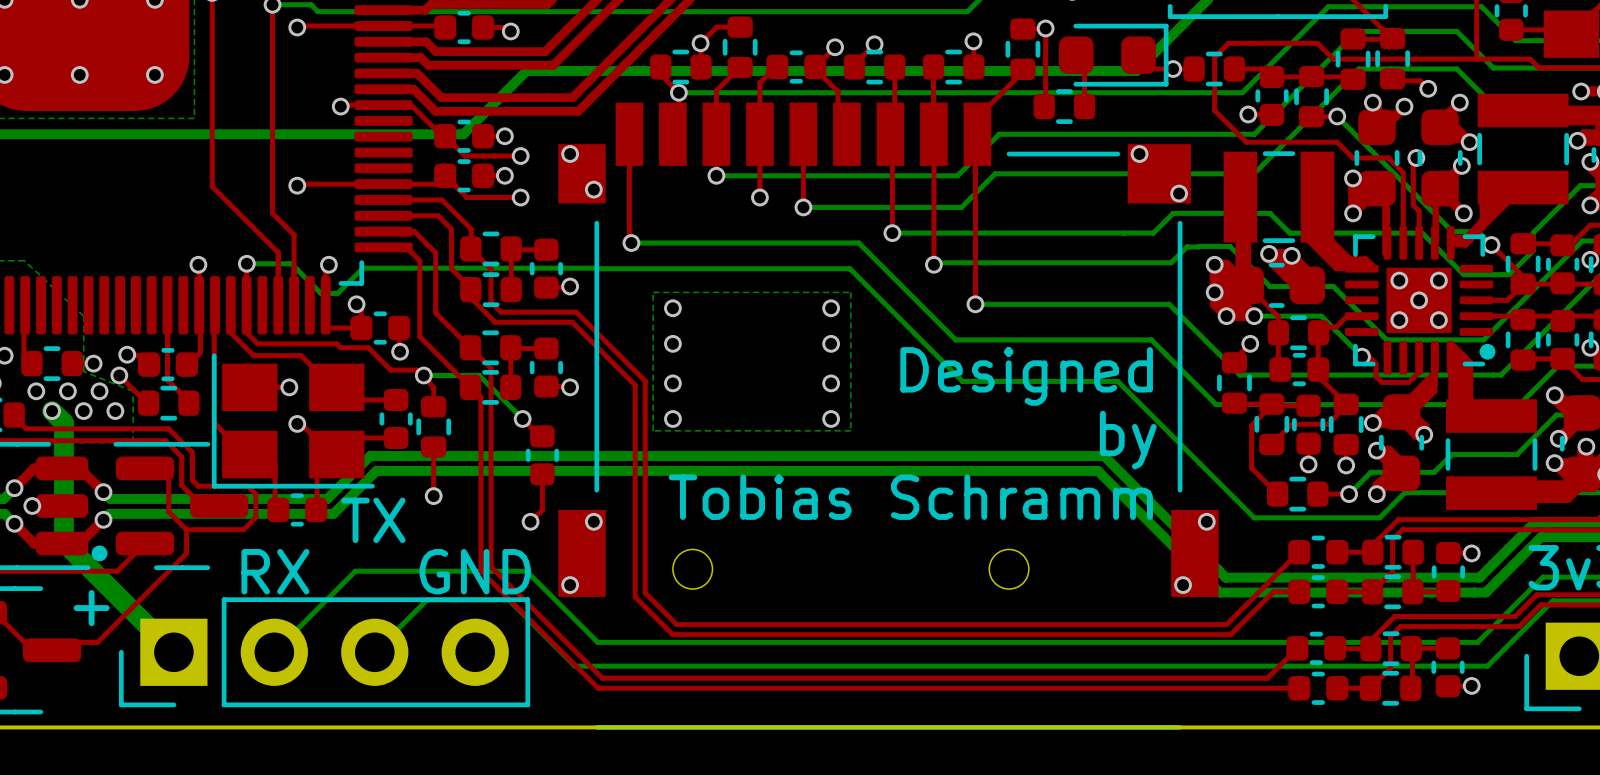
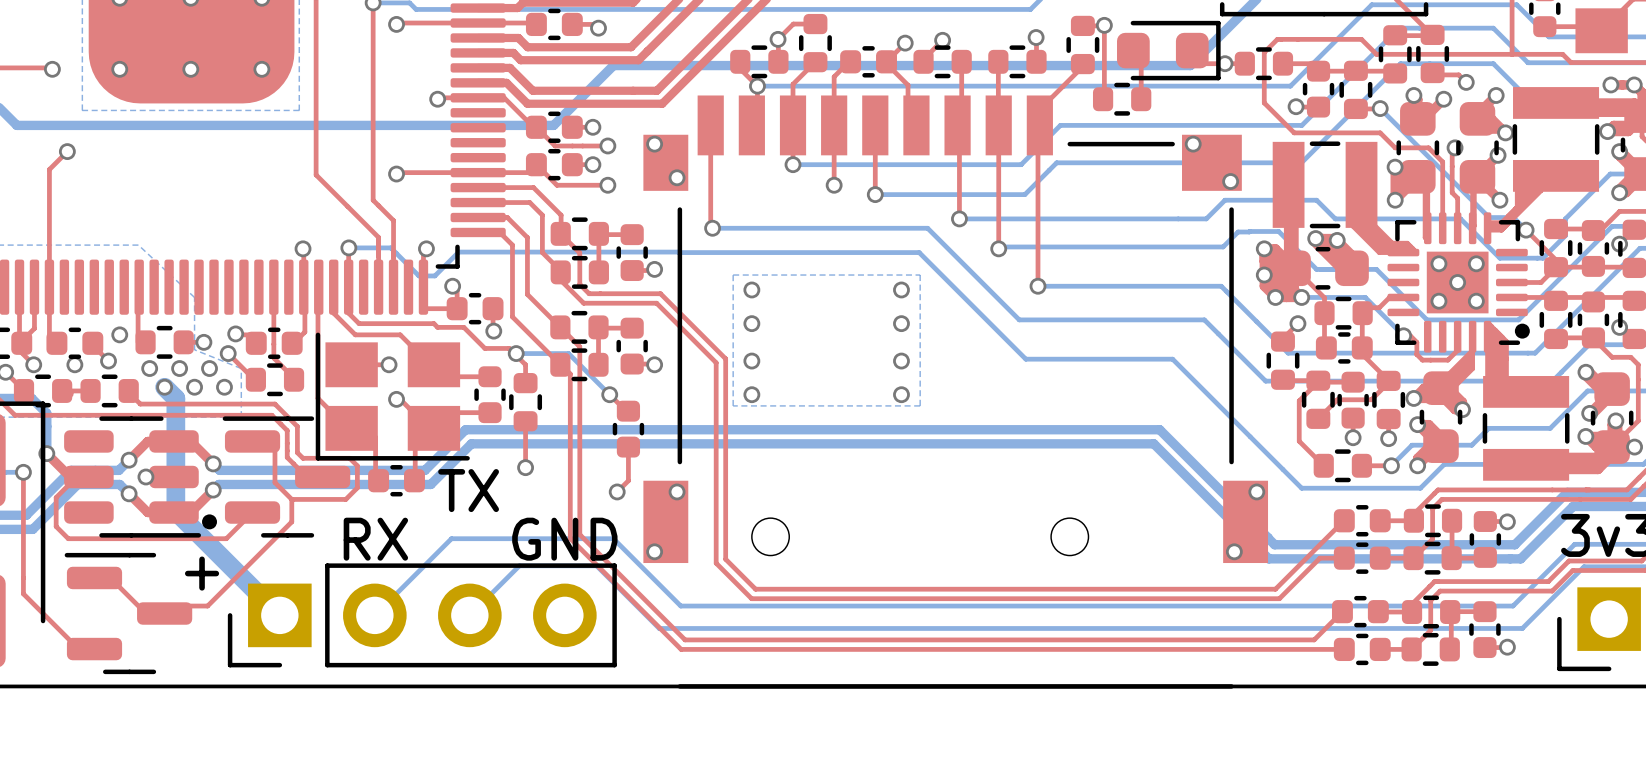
text: Designed (1026, 376) -> none
text: by (1128, 440) -> none
text: Tobias Schramm (910, 497) -> none

